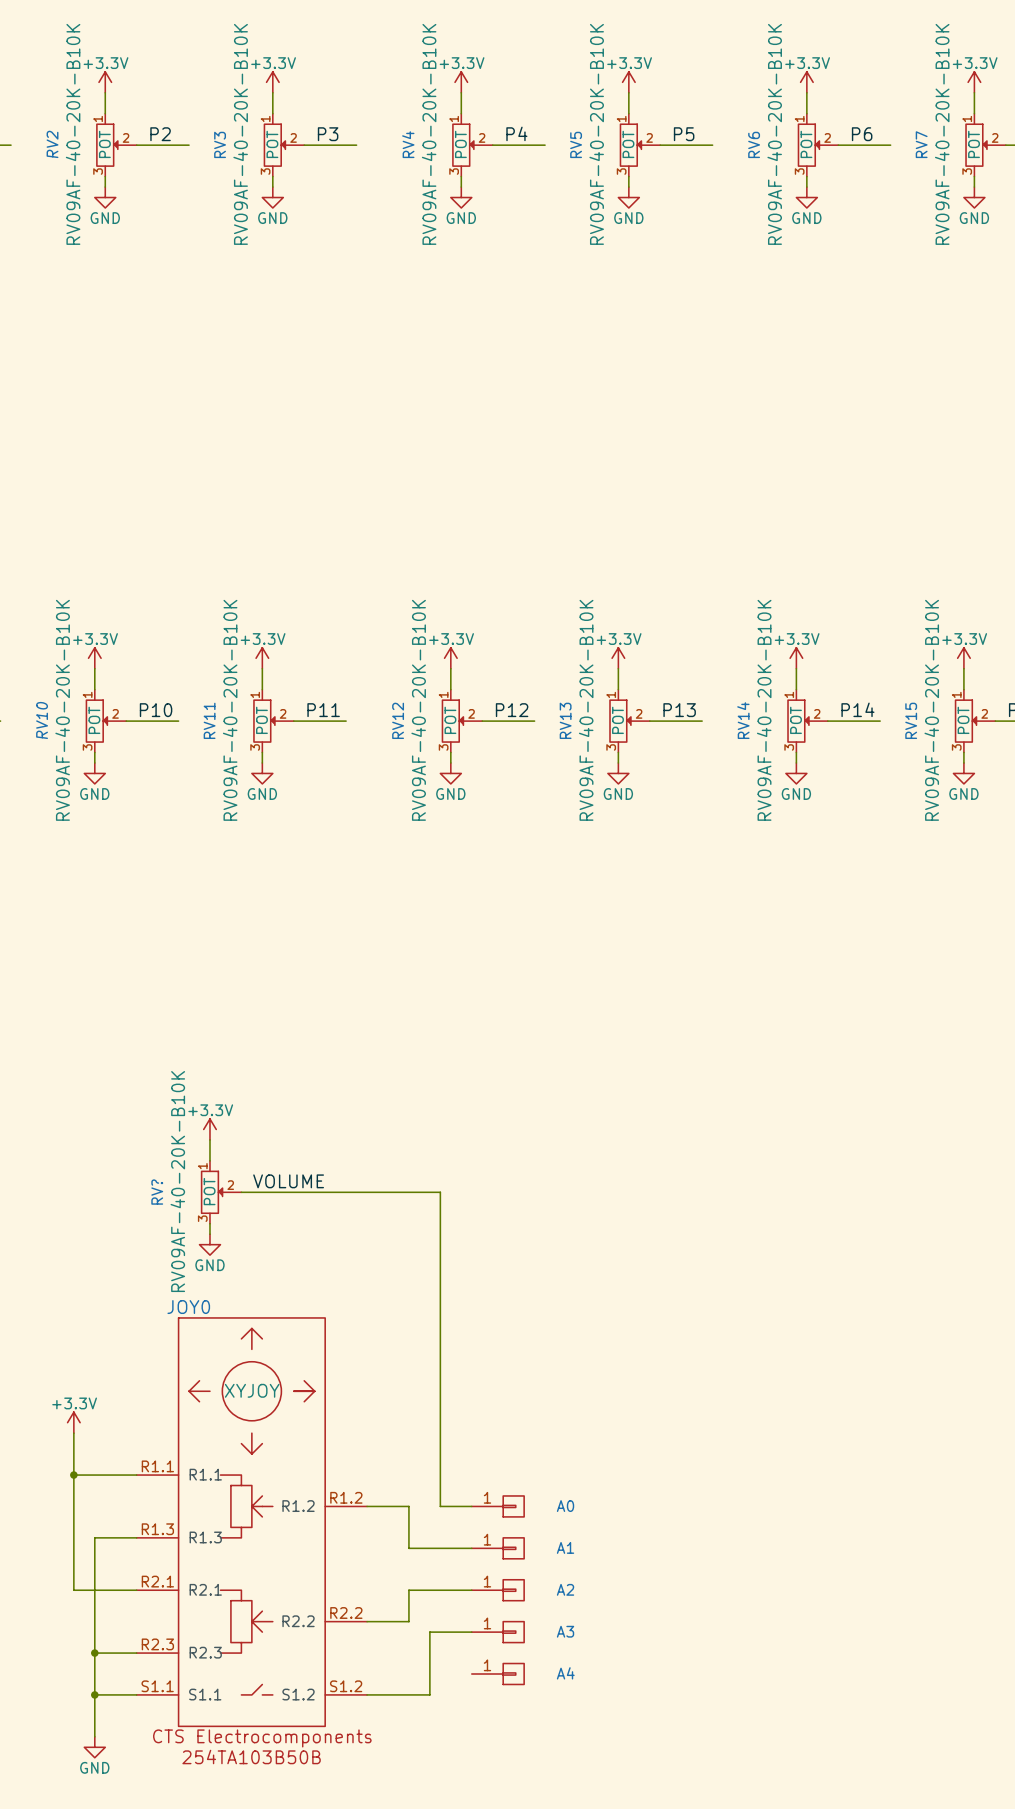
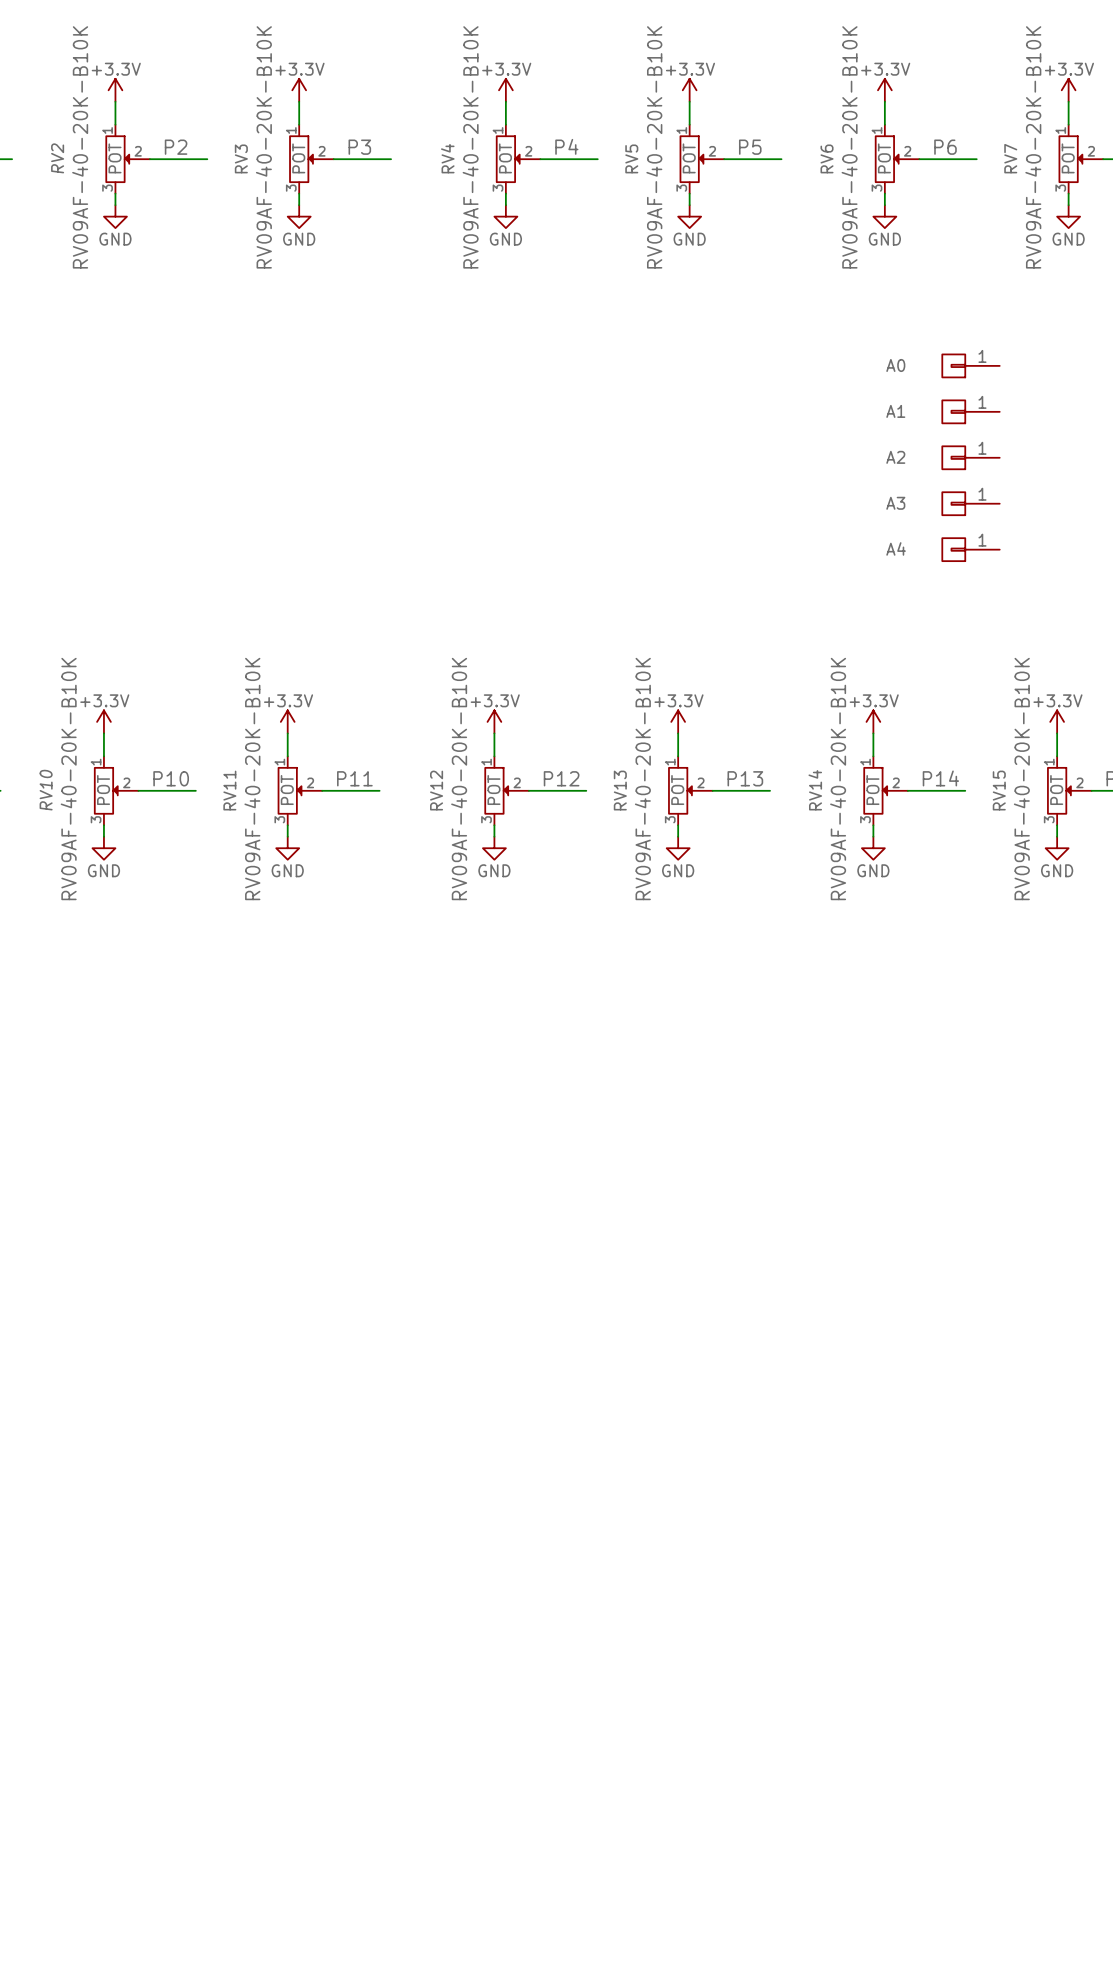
power symbol: +3.3V (209, 1129) -> none
wire: (209, 1139) (209, 1160) -> none
label: VOLUME (288, 1181) -> none
RV?: POT (221, 1192) -> none
wire: (241, 1192) (440, 1192) (440, 1506) (471, 1506) -> none
wire: (209, 1223) (209, 1234) -> none
power symbol: GND (209, 1244) -> none
power symbol: +3.3V (73, 1422) -> none
wire: (73, 1433) (73, 1590) (136, 1590) -> none
wire: (73, 1475) (136, 1475) -> none
junction: (73, 1475) -> none
wire: (367, 1506) (408, 1506) (408, 1548) (471, 1548) -> none
A0 position: (497, 1506) -> (971, 365)
A0 rotation: 0° (513, 1506) -> 180° (953, 365)
JOY0: XYJOY (251, 1522) -> none
wire: (136, 1537) (94, 1537) (94, 1736) -> none
A1 position: (497, 1548) -> (971, 411)
A1 rotation: 0° (513, 1548) -> 180° (953, 411)
wire: (471, 1590) (408, 1590) (408, 1621) (367, 1621) -> none
A2 position: (497, 1590) -> (971, 457)
A2 rotation: 0° (513, 1590) -> 180° (953, 457)
wire: (471, 1632) (429, 1632) (429, 1694) (367, 1694) -> none
A3 position: (497, 1632) -> (971, 503)
A3 rotation: 0° (513, 1632) -> 180° (953, 503)
wire: (94, 1653) (136, 1653) -> none
junction: (94, 1653) -> none
A4 position: (497, 1673) -> (971, 549)
A4 rotation: 0° (513, 1673) -> 180° (953, 549)
wire: (94, 1694) (136, 1694) -> none
junction: (94, 1694) -> none
power symbol: GND (94, 1747) -> none

